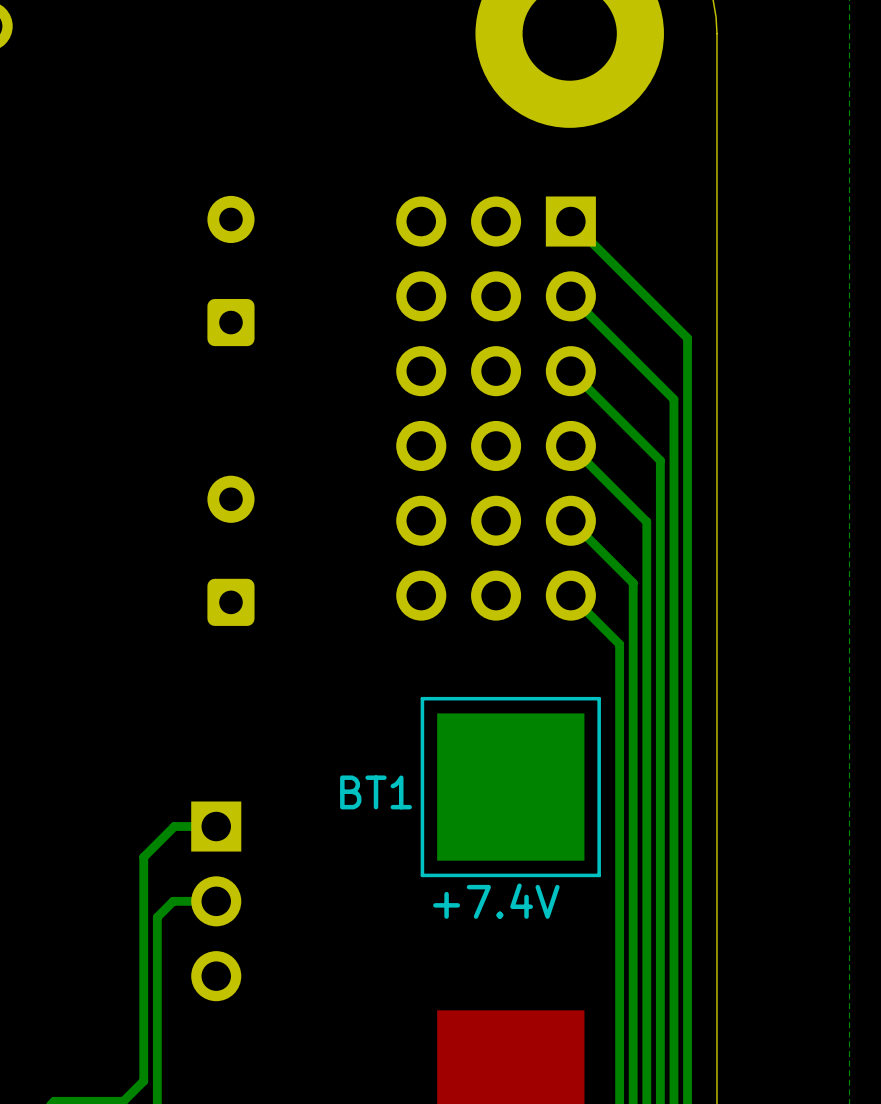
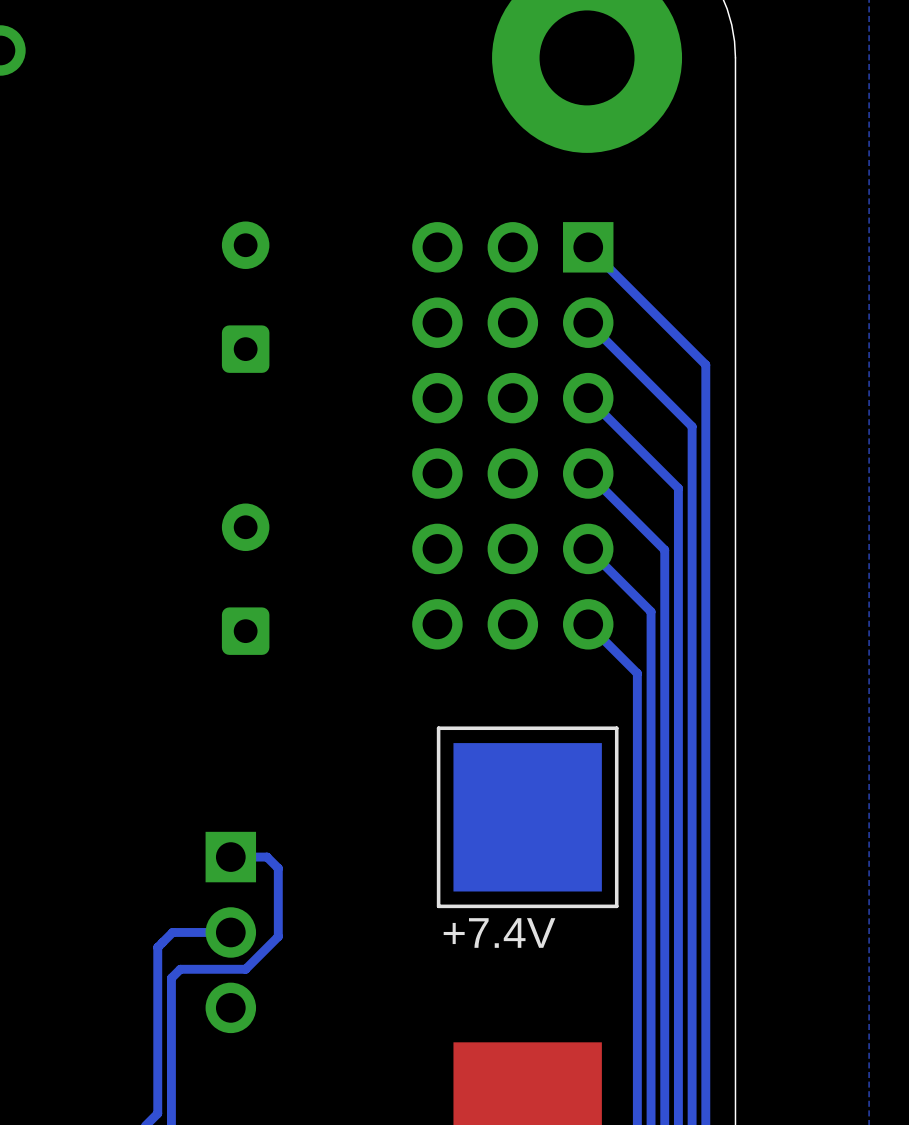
text: BT1 (376, 792) -> none
bottom track: (216, 826) (174, 826) (143, 857) (143, 916) -> none
bottom track: none -> (230, 859) (230, 857) (267, 857) (278, 868) (278, 936) (245, 969) (180, 969) (171, 978)
bottom track: (173, 901) (157, 917) (157, 946) -> (187, 932) (172, 932) (157, 947)

